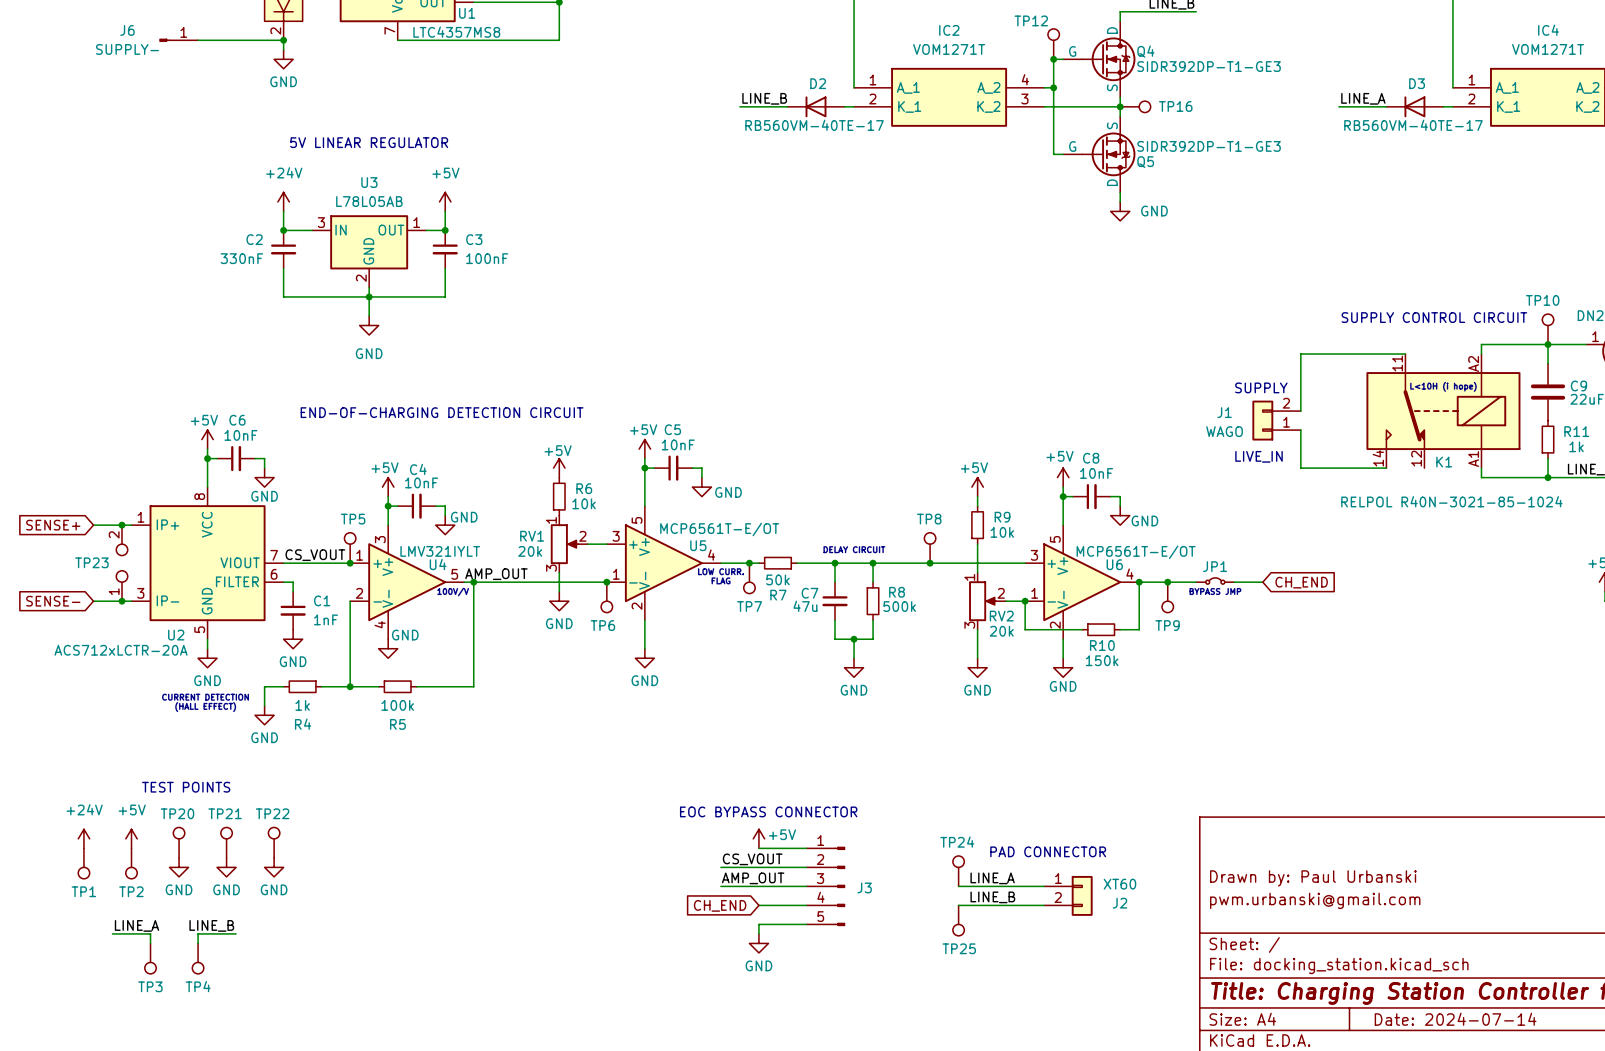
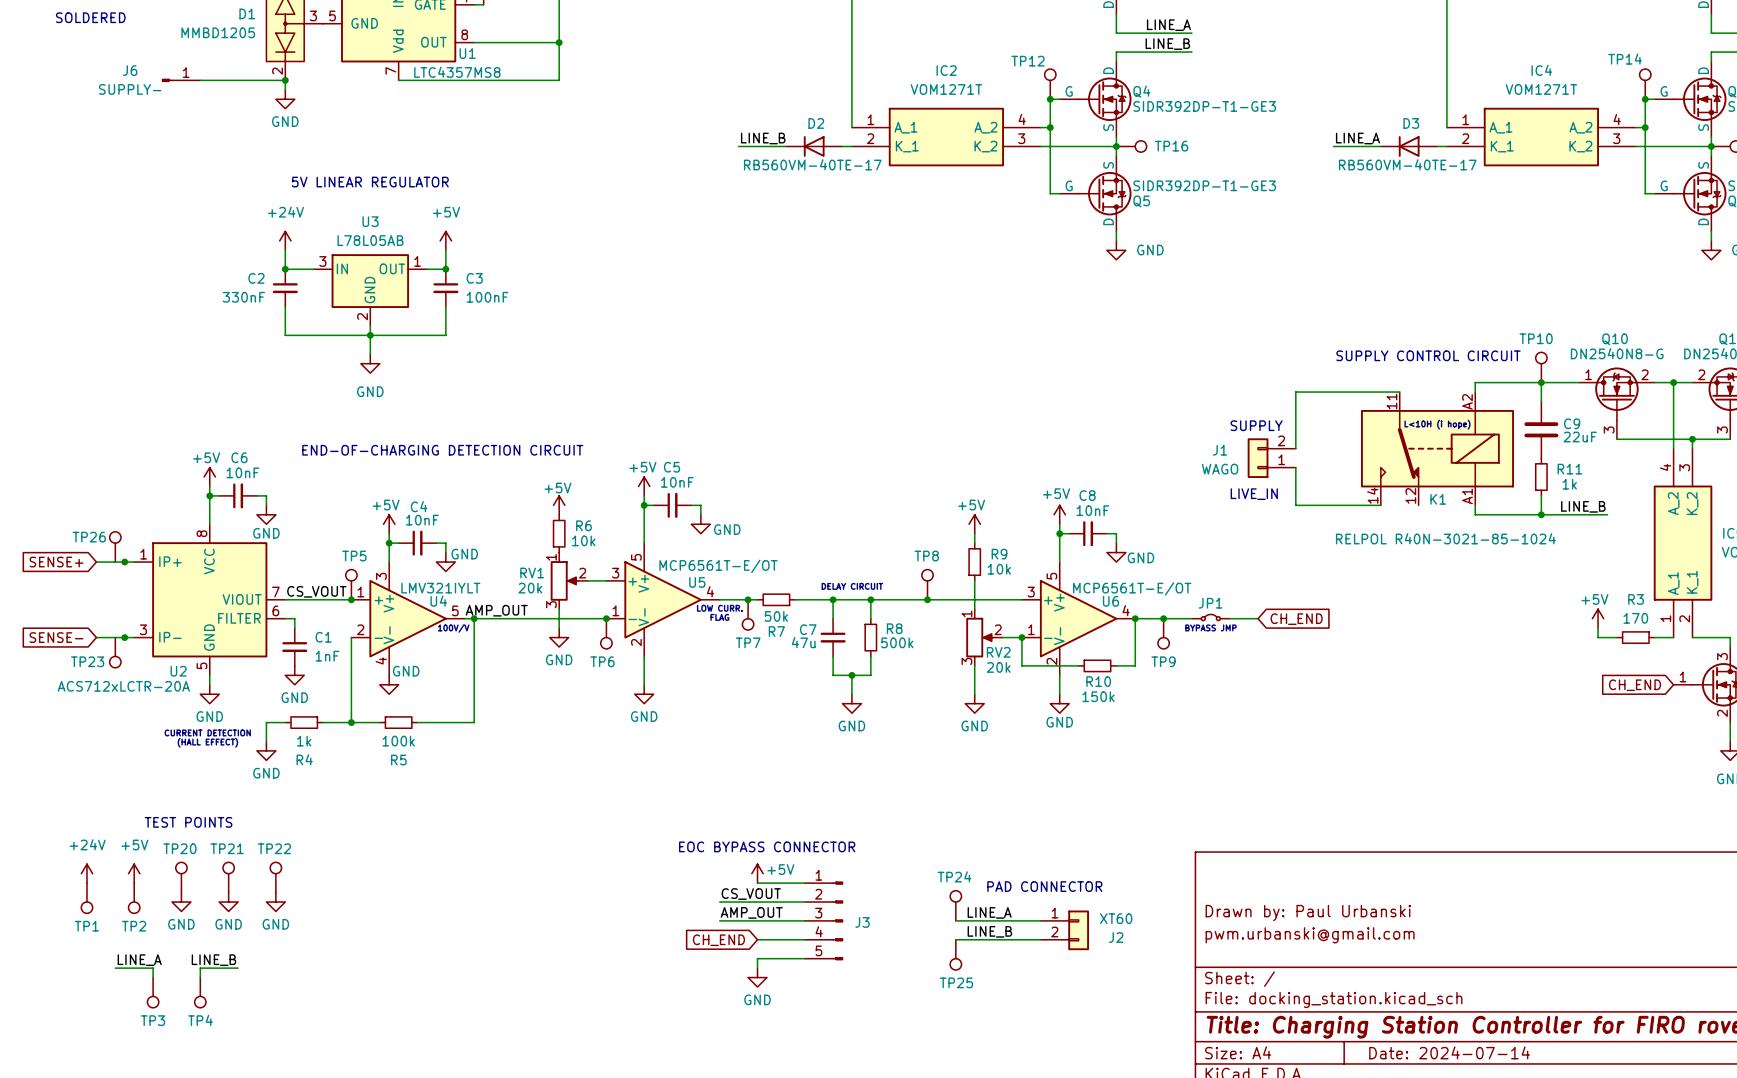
TP26: none -> (115, 546)
TP23 symbol: [116, 525, 128, 602] -> [109, 637, 121, 668]

